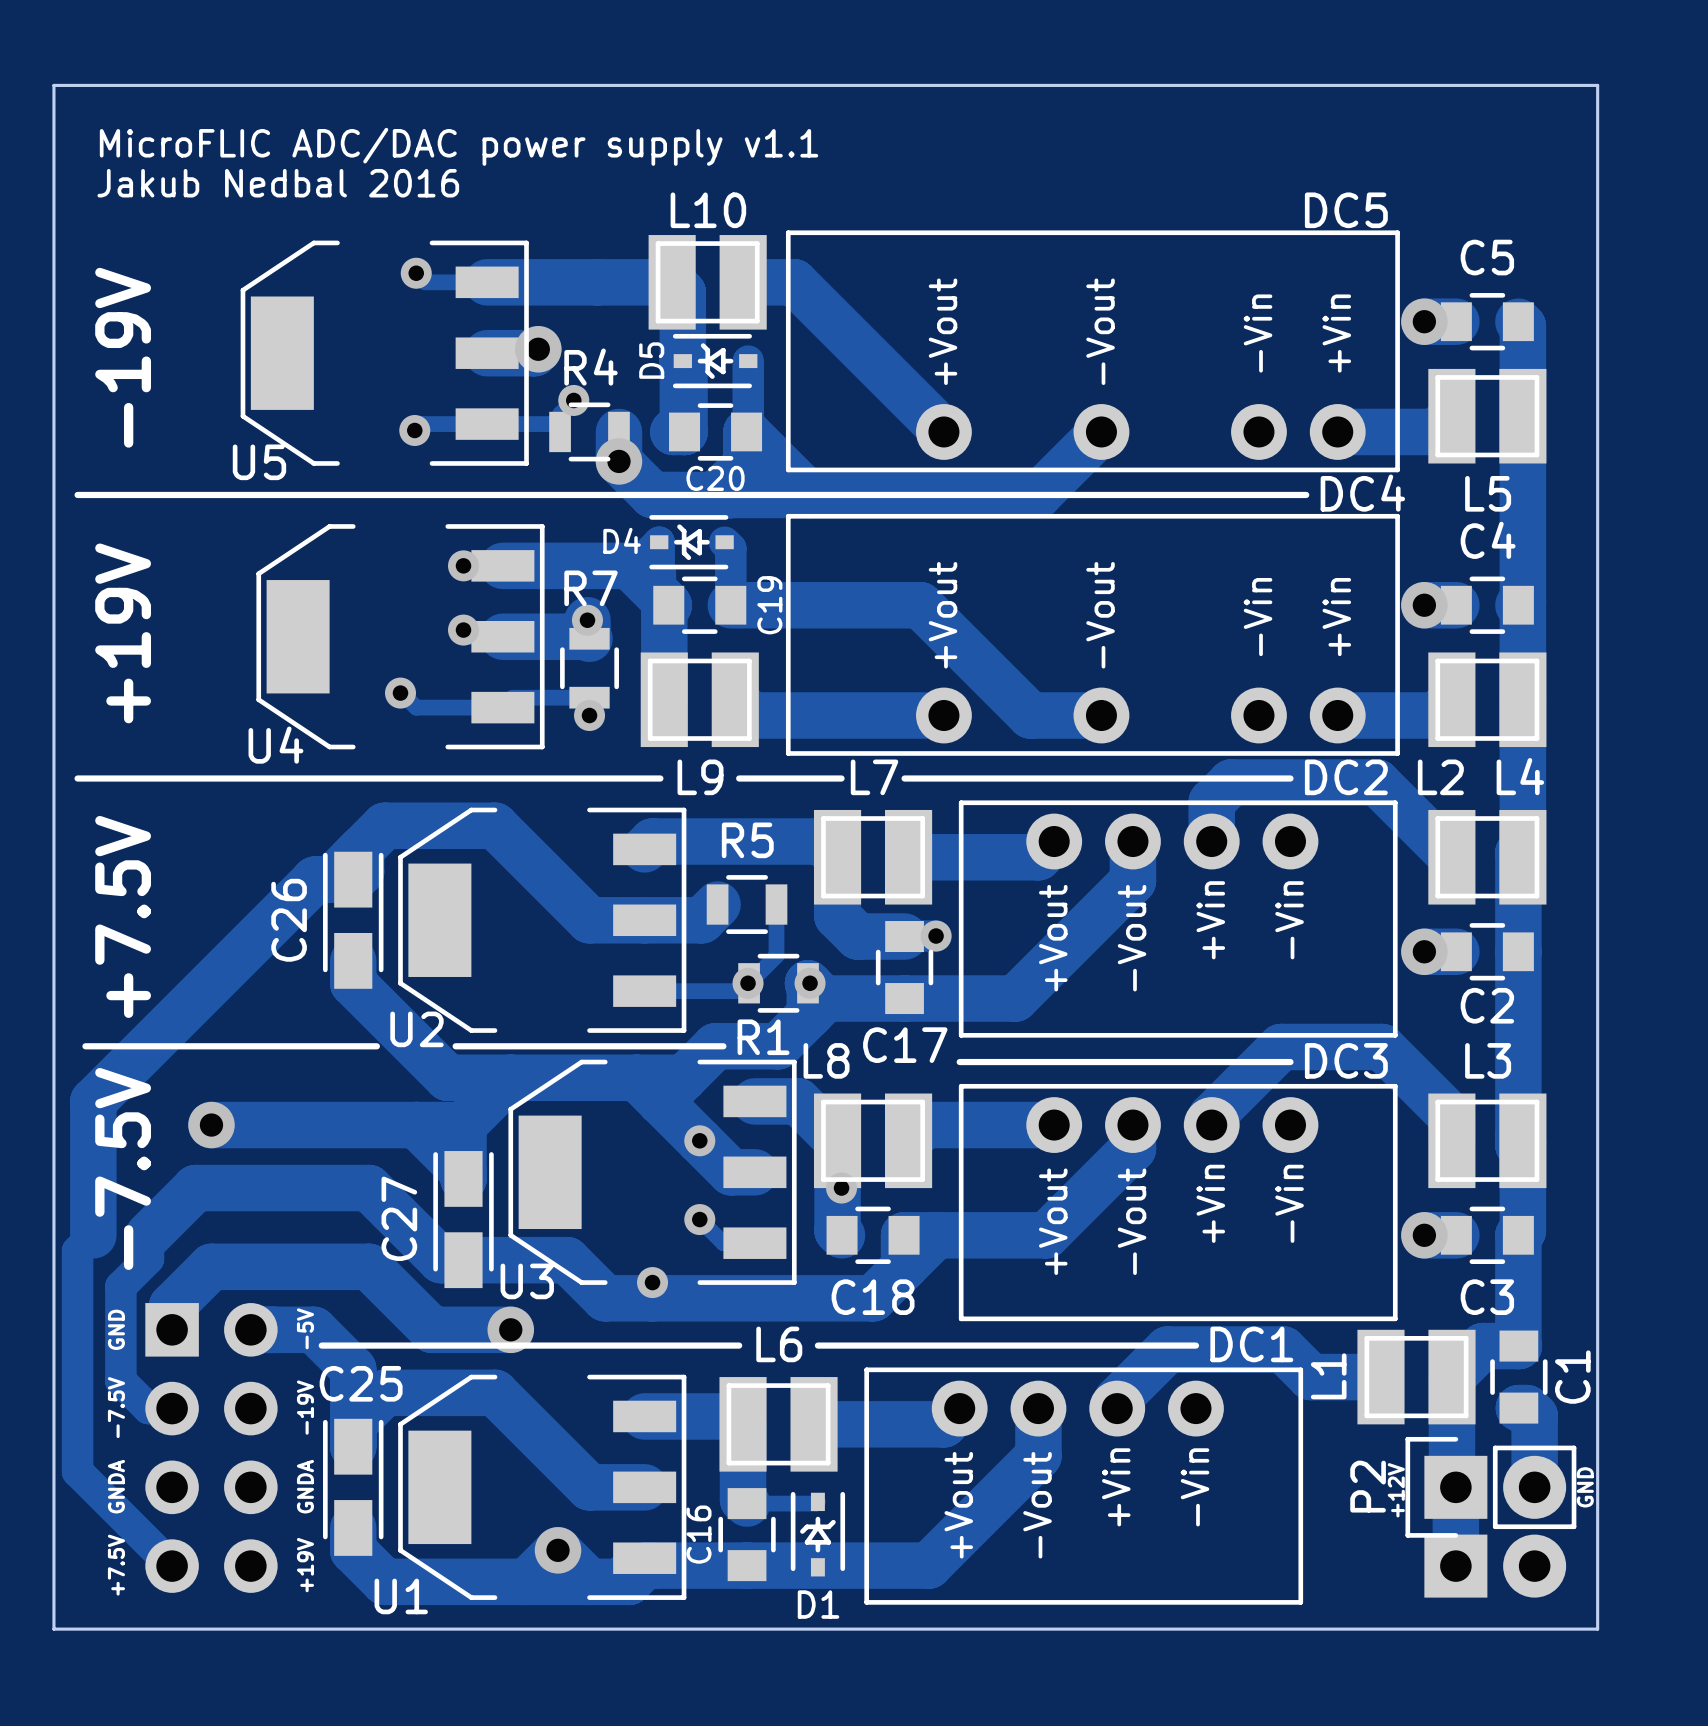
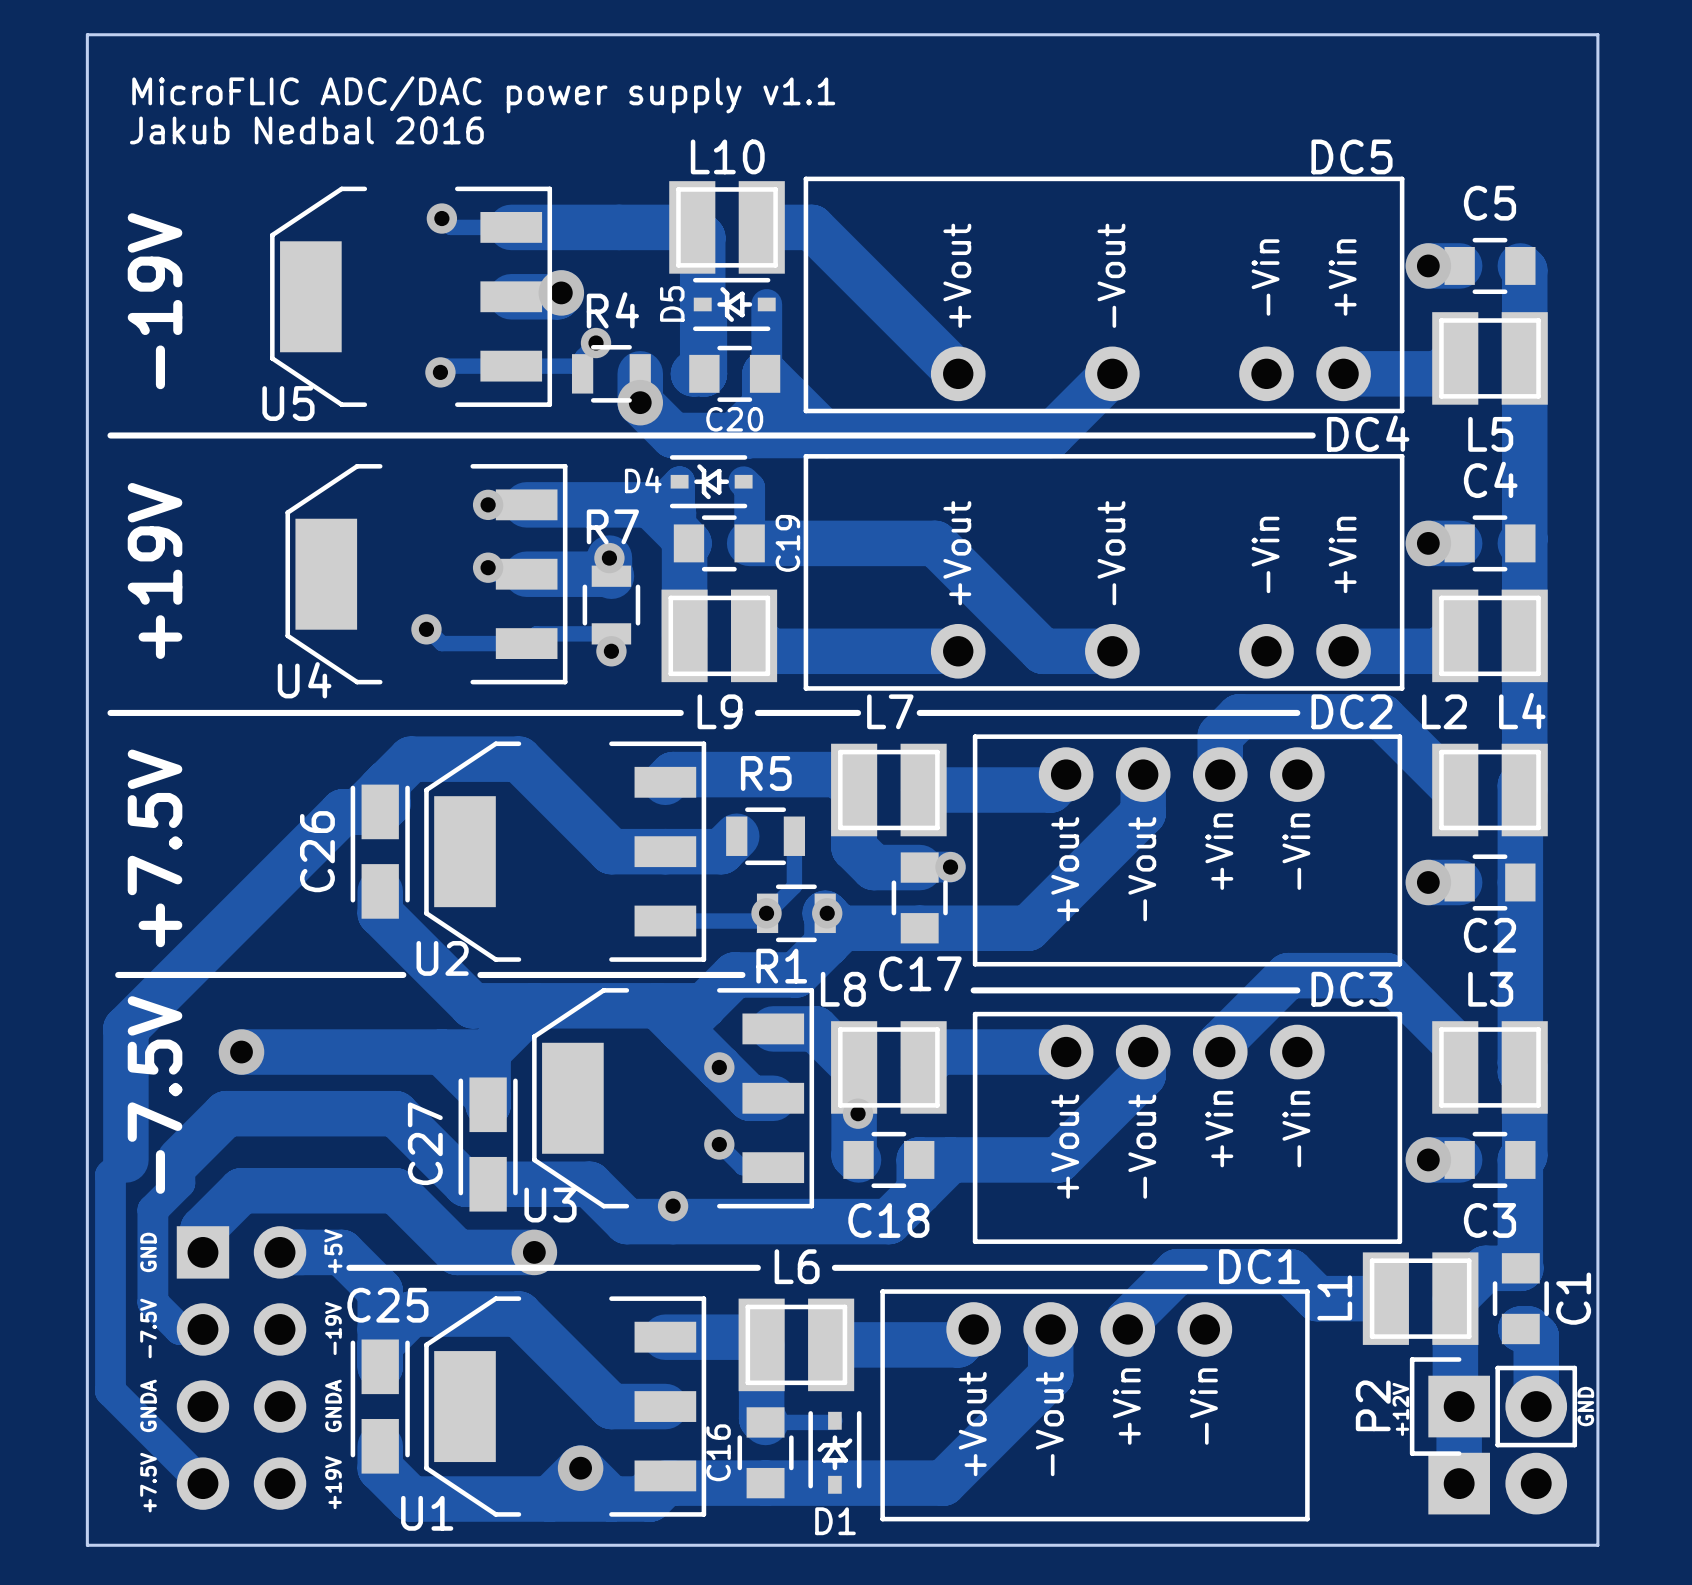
text: -5V (305, 1328) -> +5V (333, 1251)

